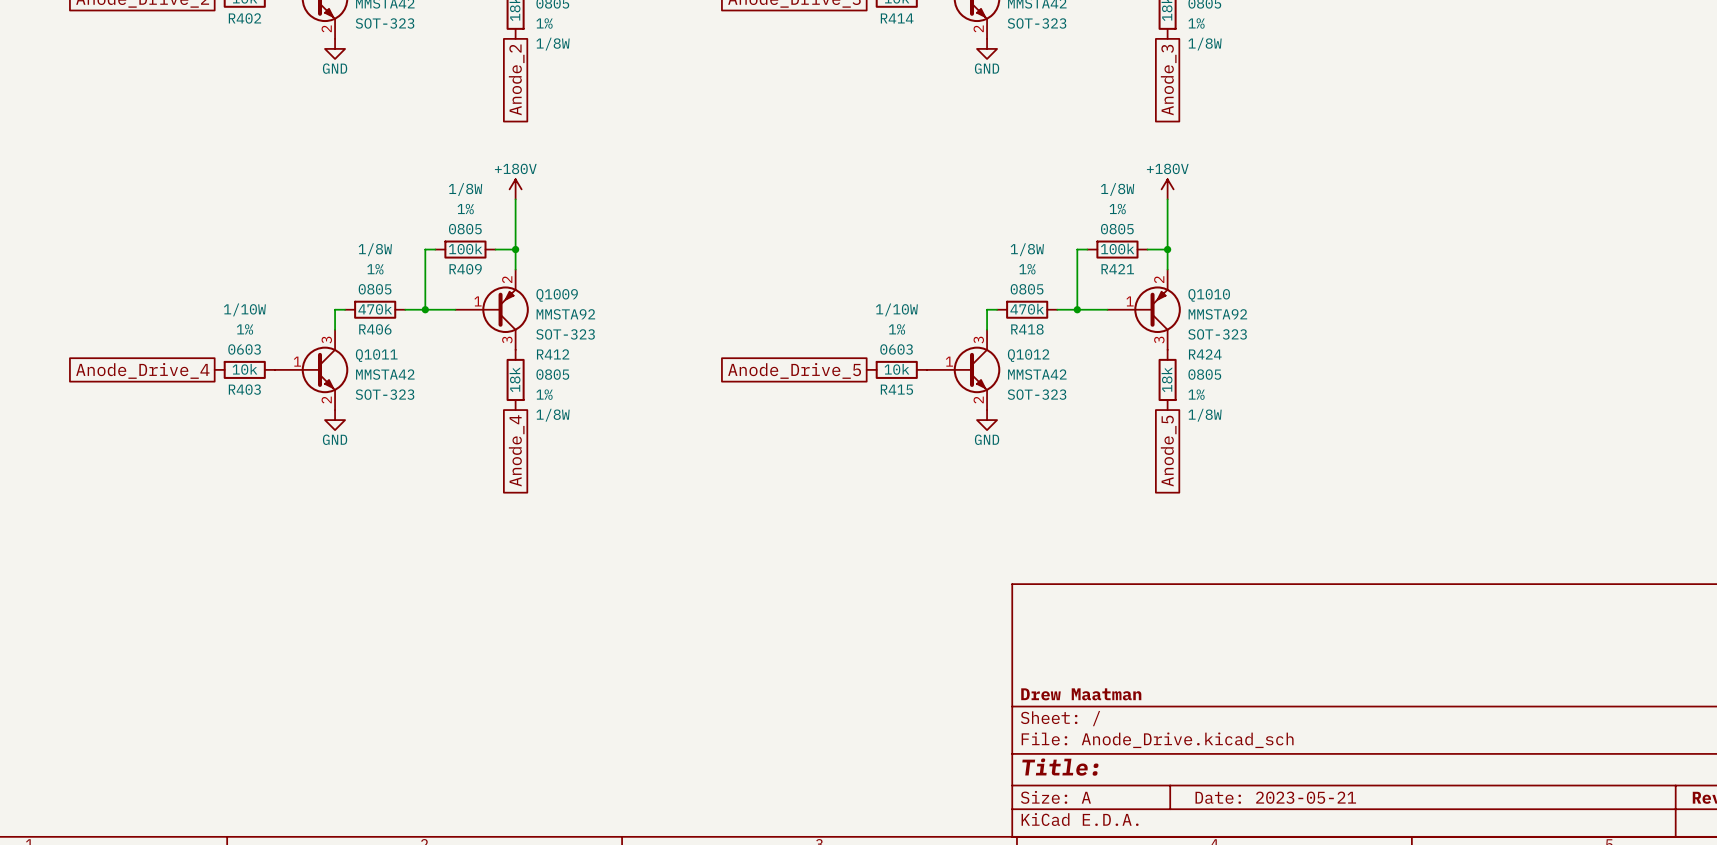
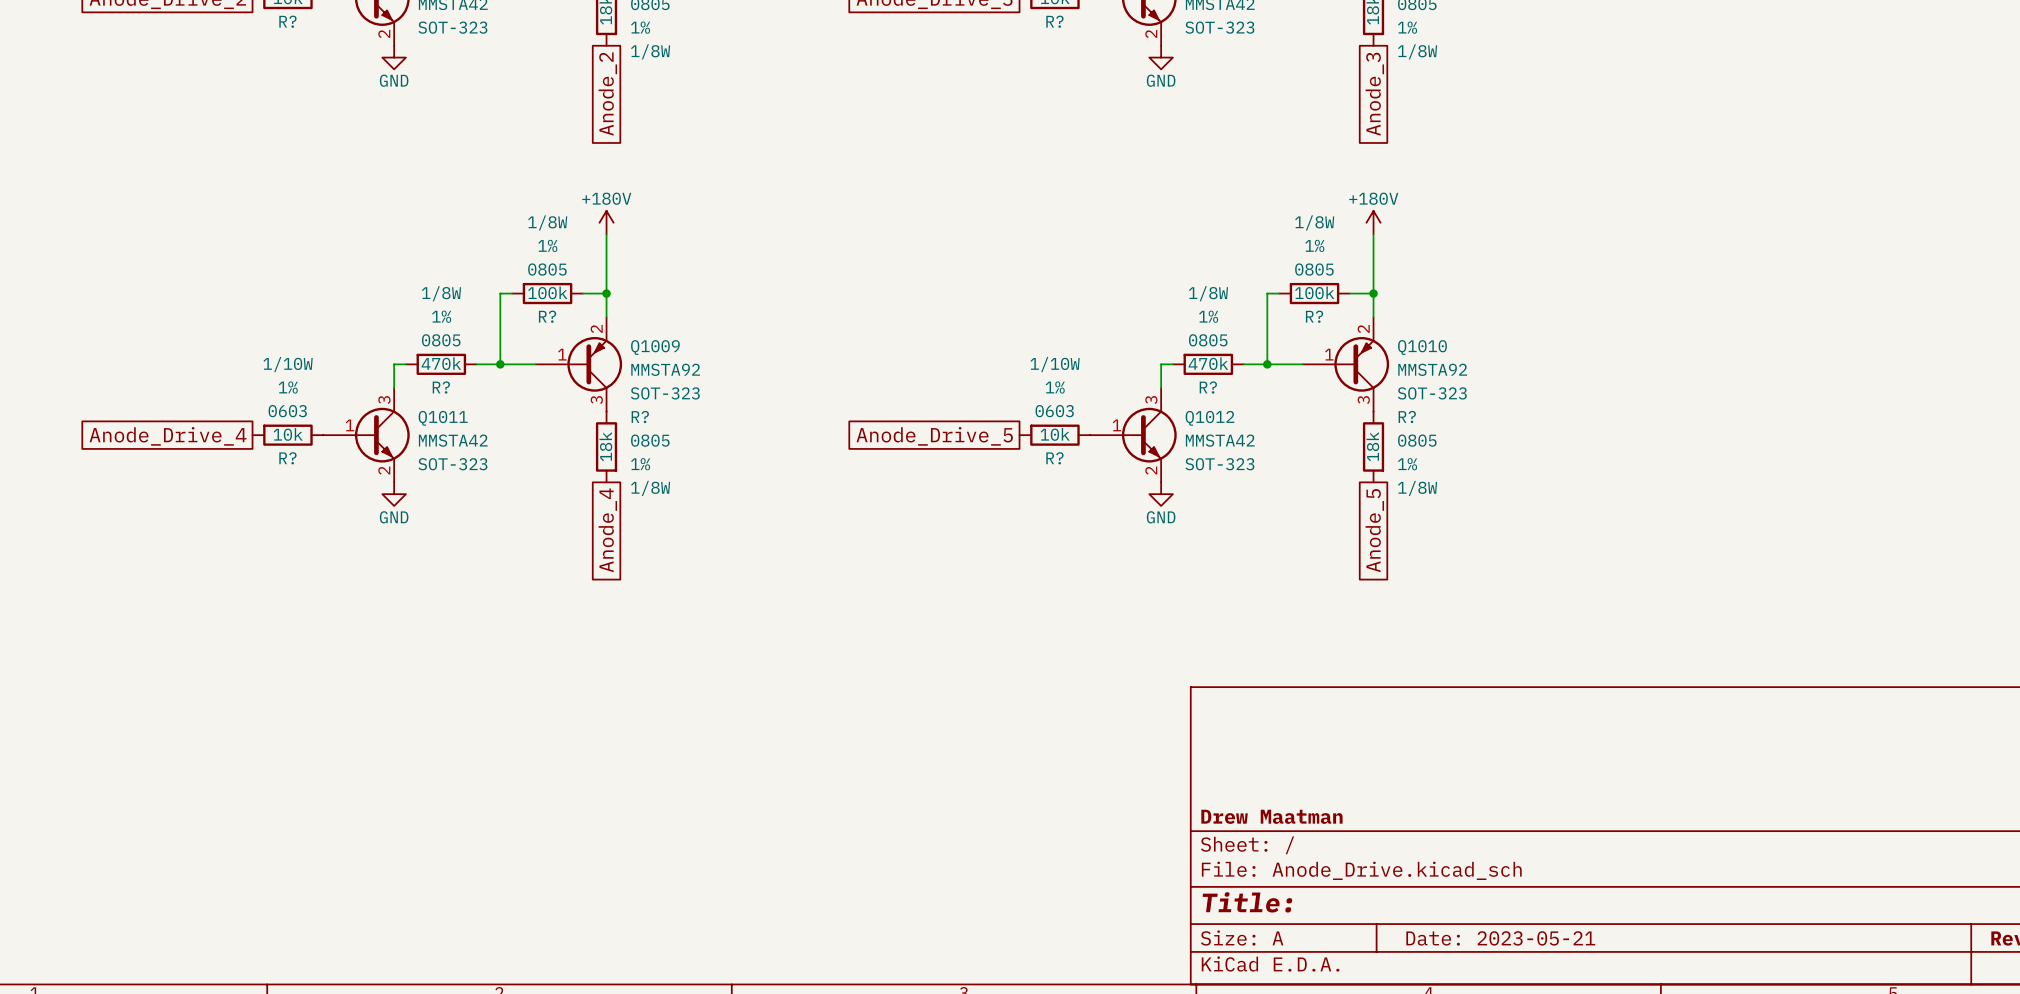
R402 name: R402 (244, 18) -> R? (287, 21)
R414 name: R414 (897, 18) -> R? (1054, 21)
R409 name: R409 (465, 269) -> R? (547, 316)
R421 name: R421 (1117, 269) -> R? (1314, 316)
R406 name: R406 (375, 329) -> R? (441, 387)
R418 name: R418 (1027, 329) -> R? (1208, 387)
R412 name: R412 (553, 354) -> R? (640, 416)
R424 name: R424 (1205, 354) -> R? (1407, 416)
R403 name: R403 (244, 389) -> R? (287, 458)
R415 name: R415 (896, 389) -> R? (1054, 458)

